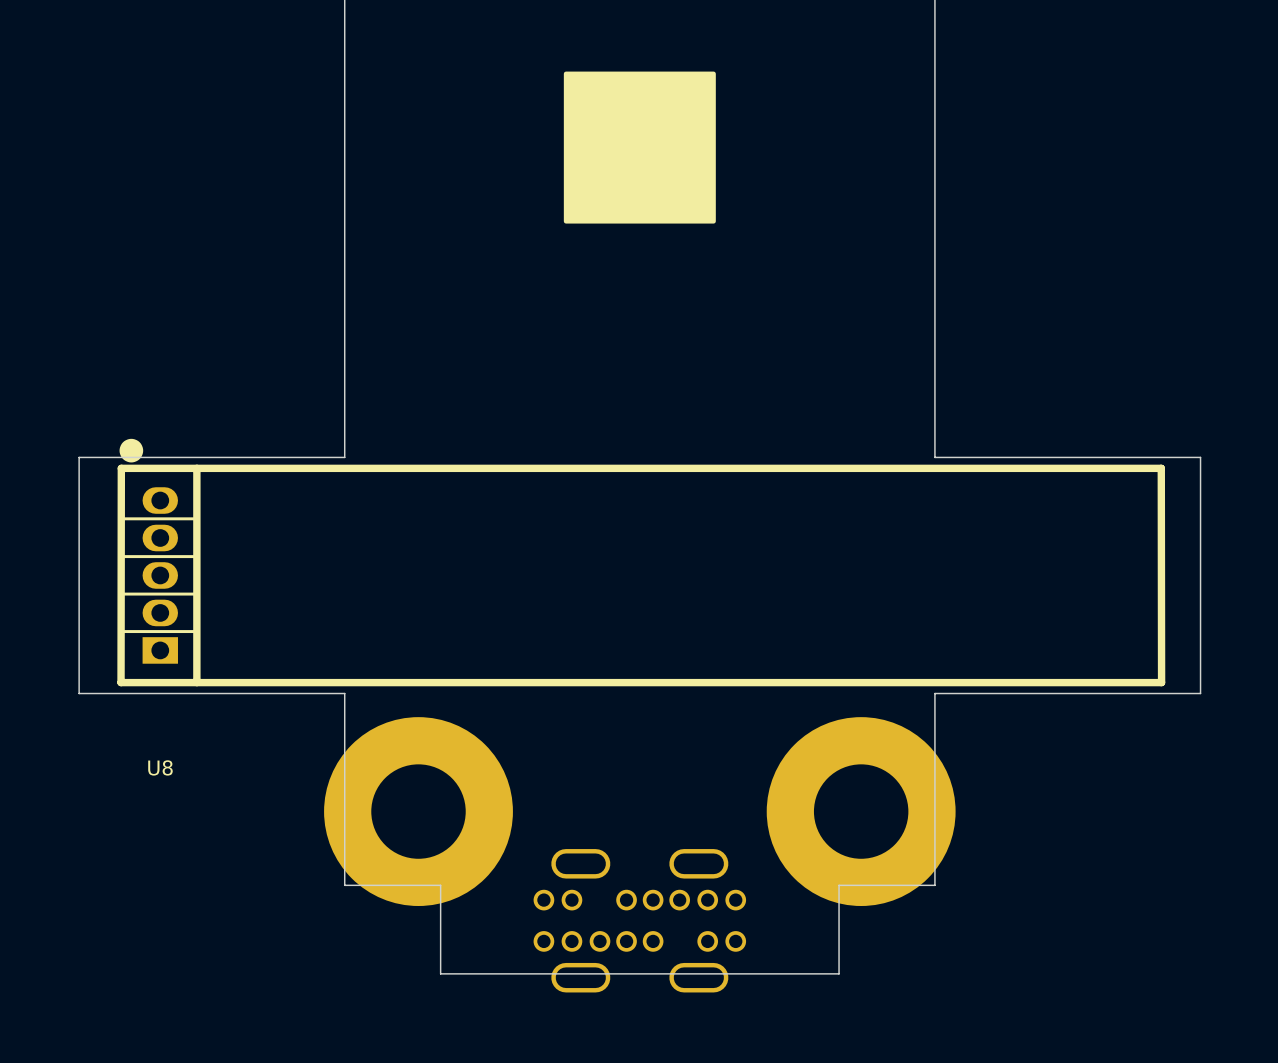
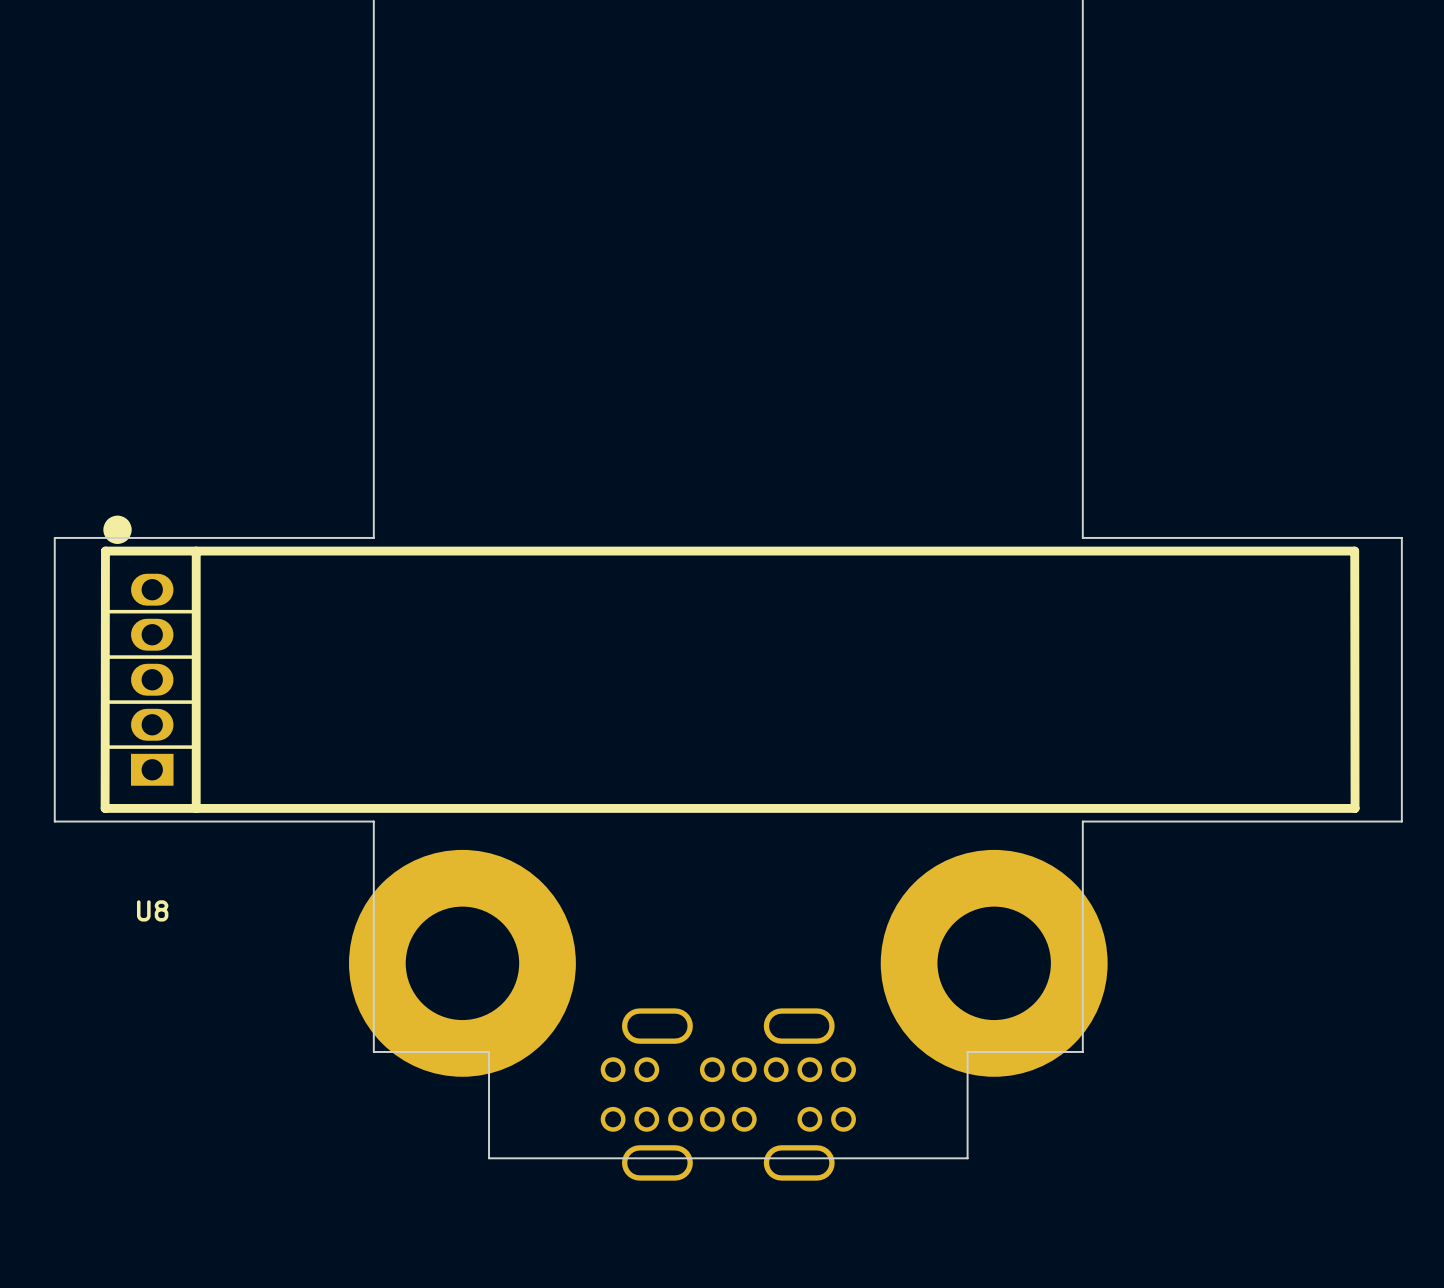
drawing: [563, 71, 716, 224] -> none

